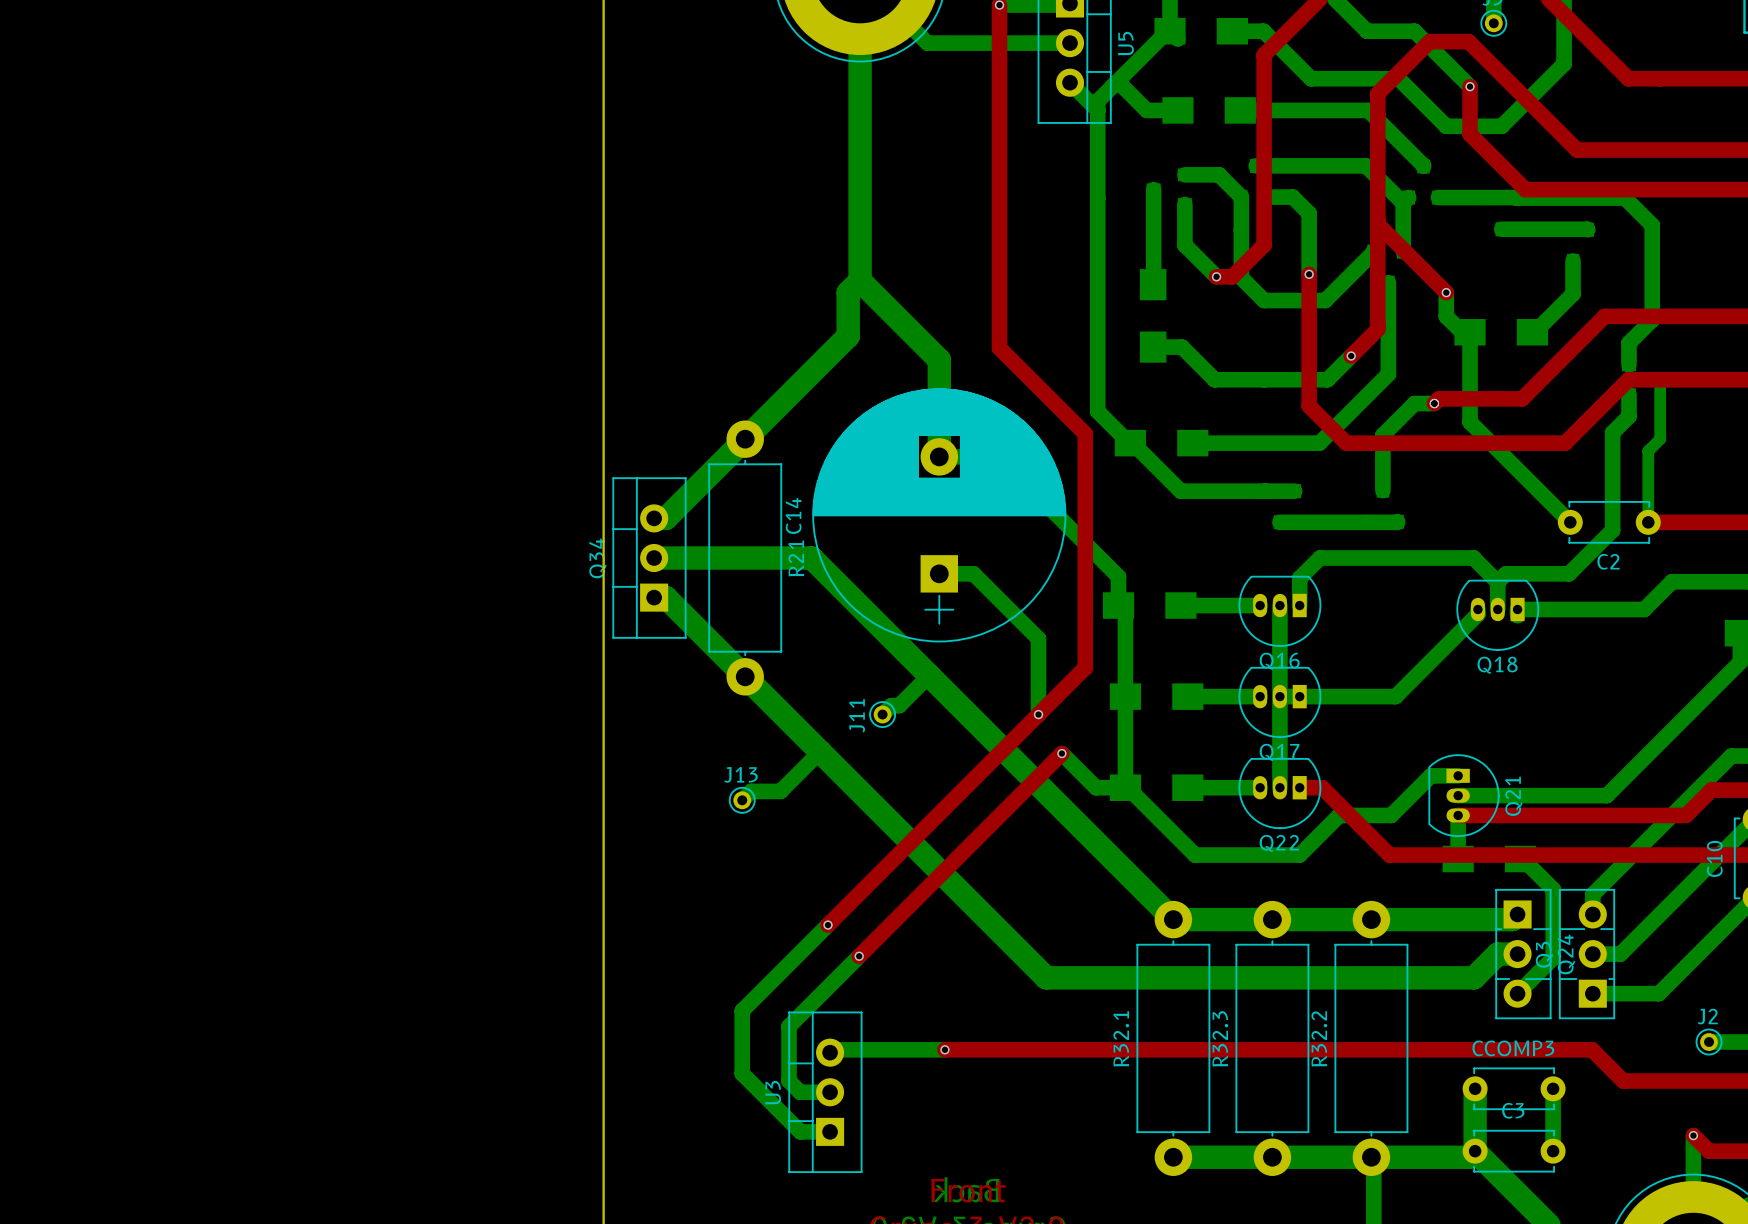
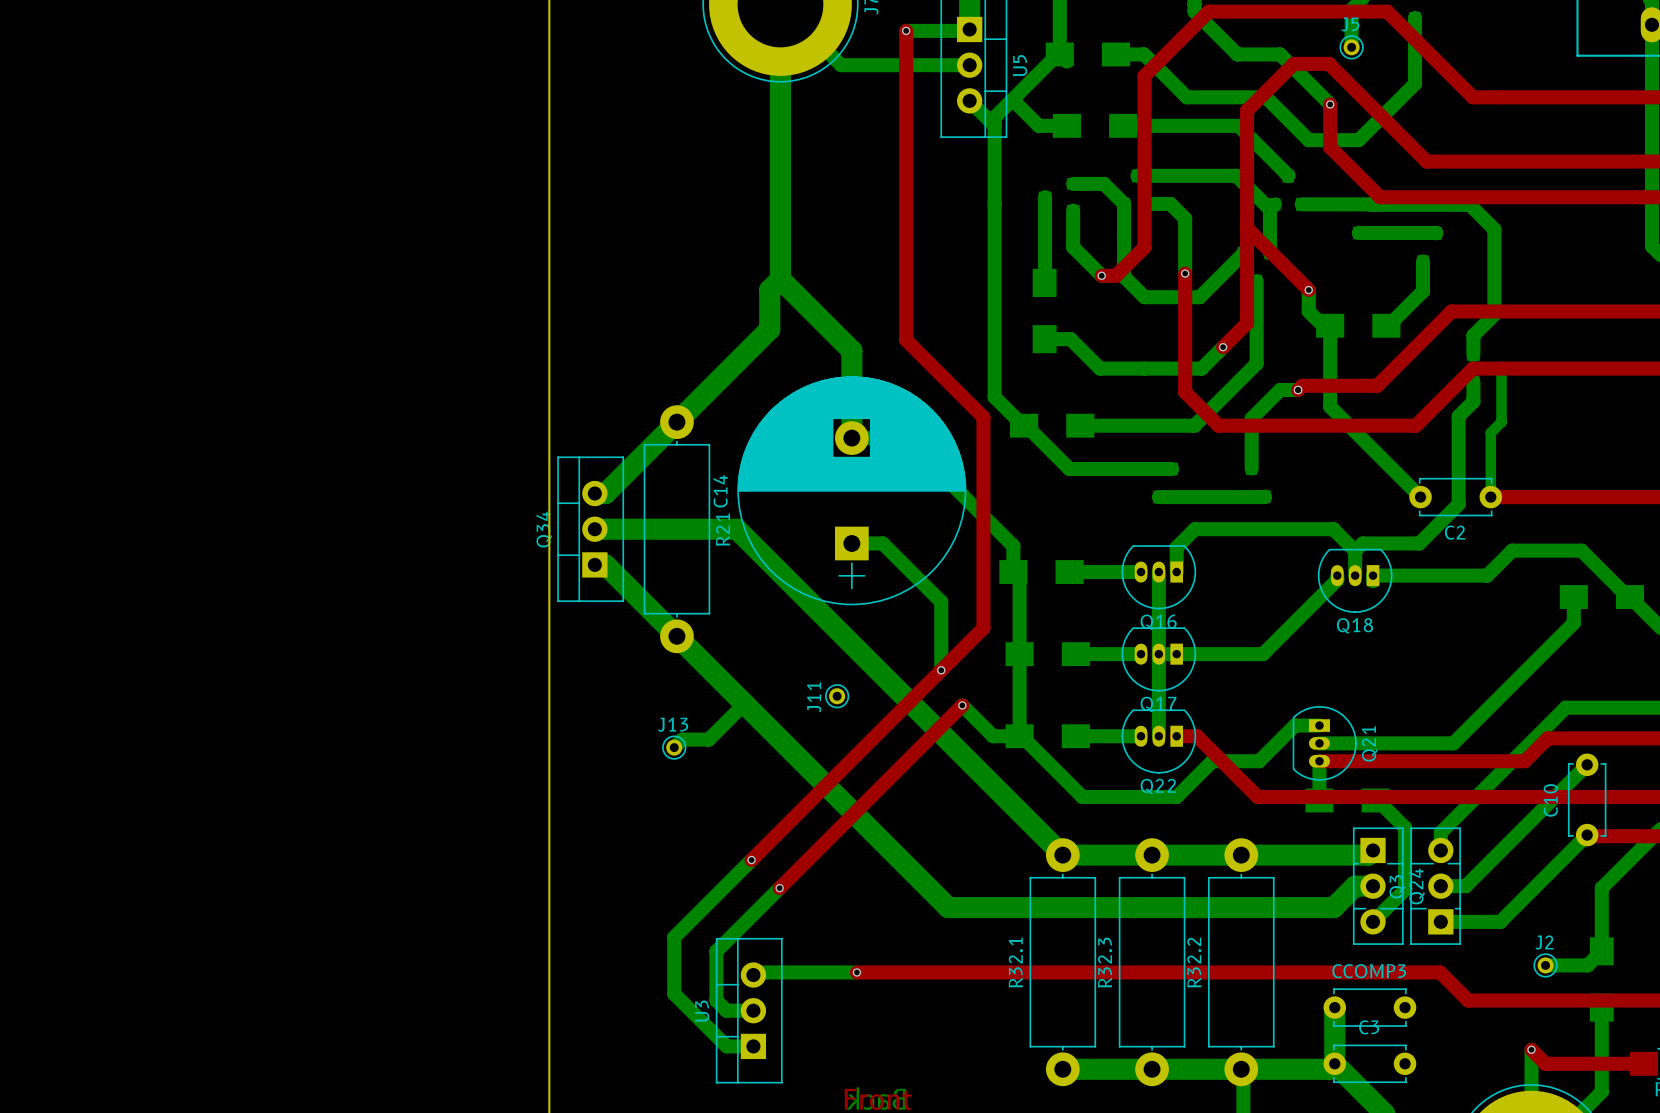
bottom track: (929, 675) (899, 705) (891, 705) (882, 714) -> none
J11 position: (882, 714) -> (837, 696)
bottom track: (1553, 1088) (1553, 1151) -> none

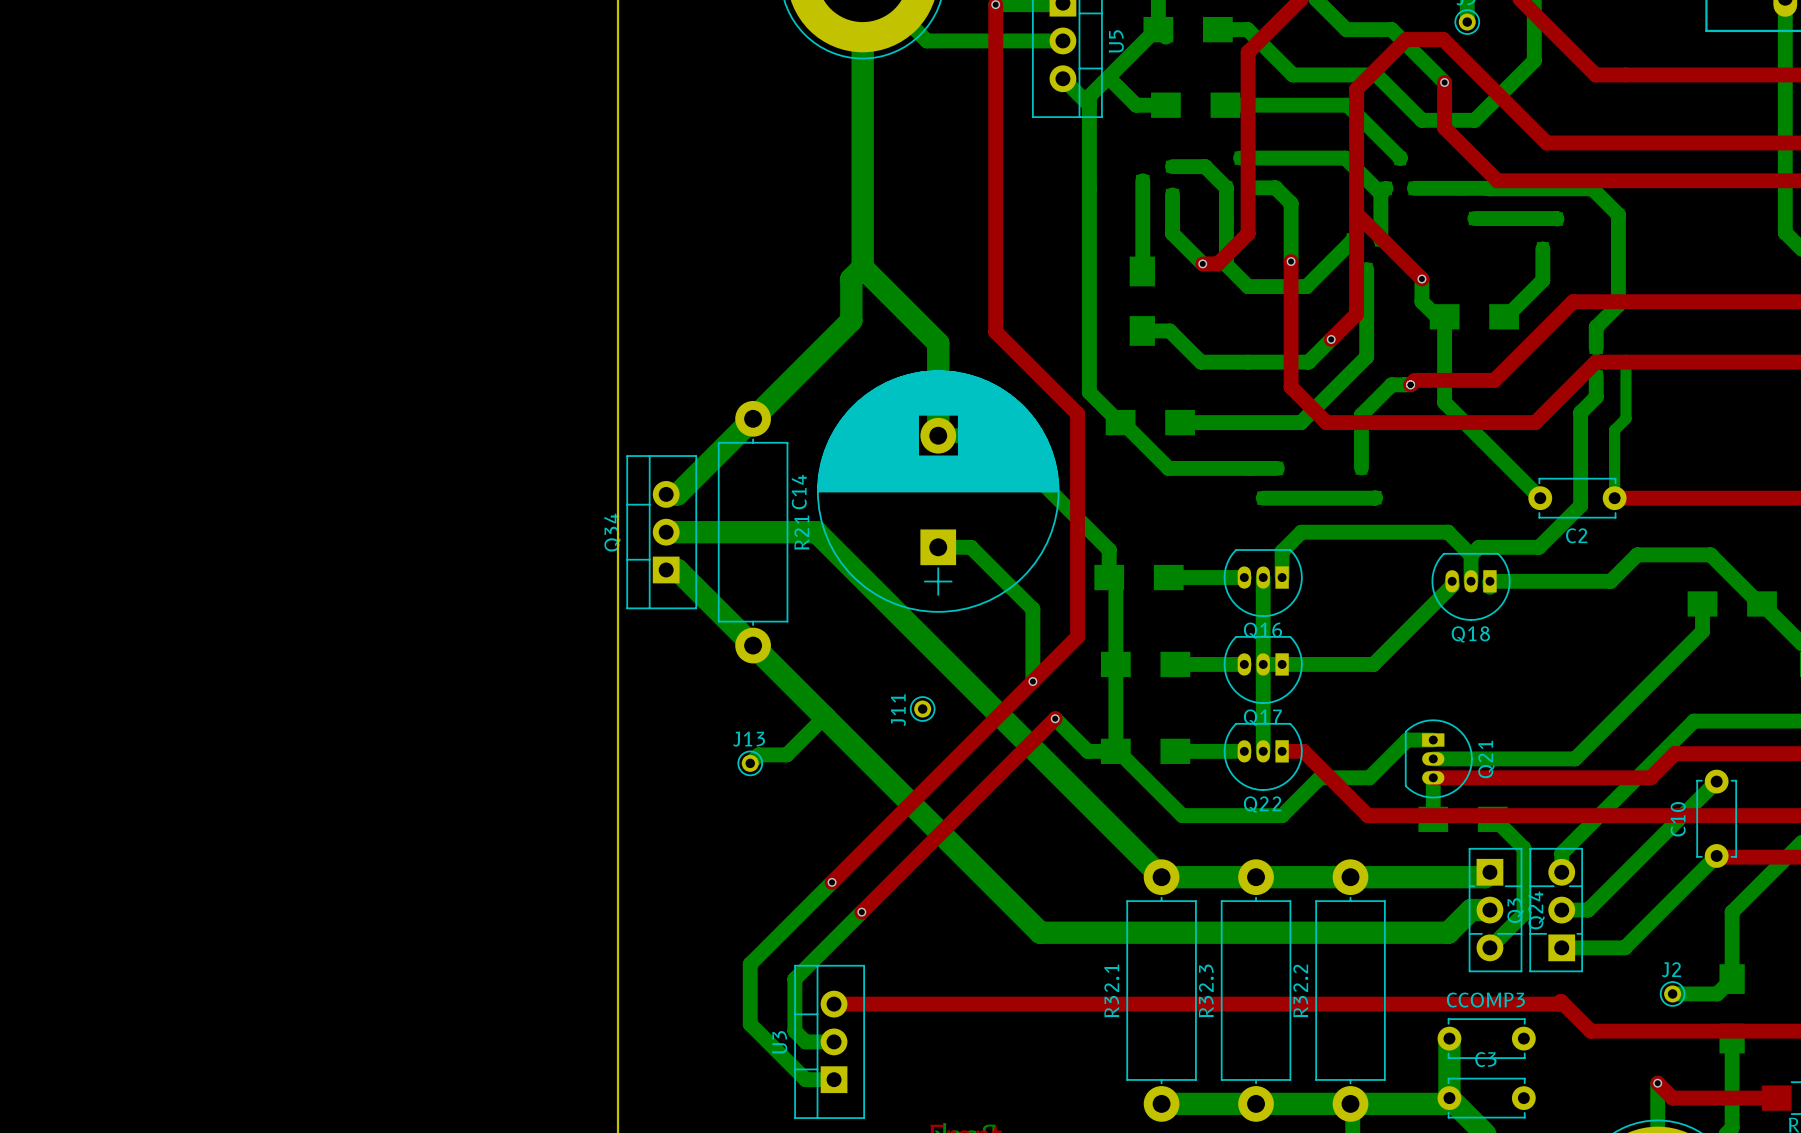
bottom track: (856, 972) (755, 972) (753, 975) -> none
top track: (856, 972) (1440, 972) -> (834, 1004) (1558, 1004) (1561, 1001)
via: (856, 972) -> none

